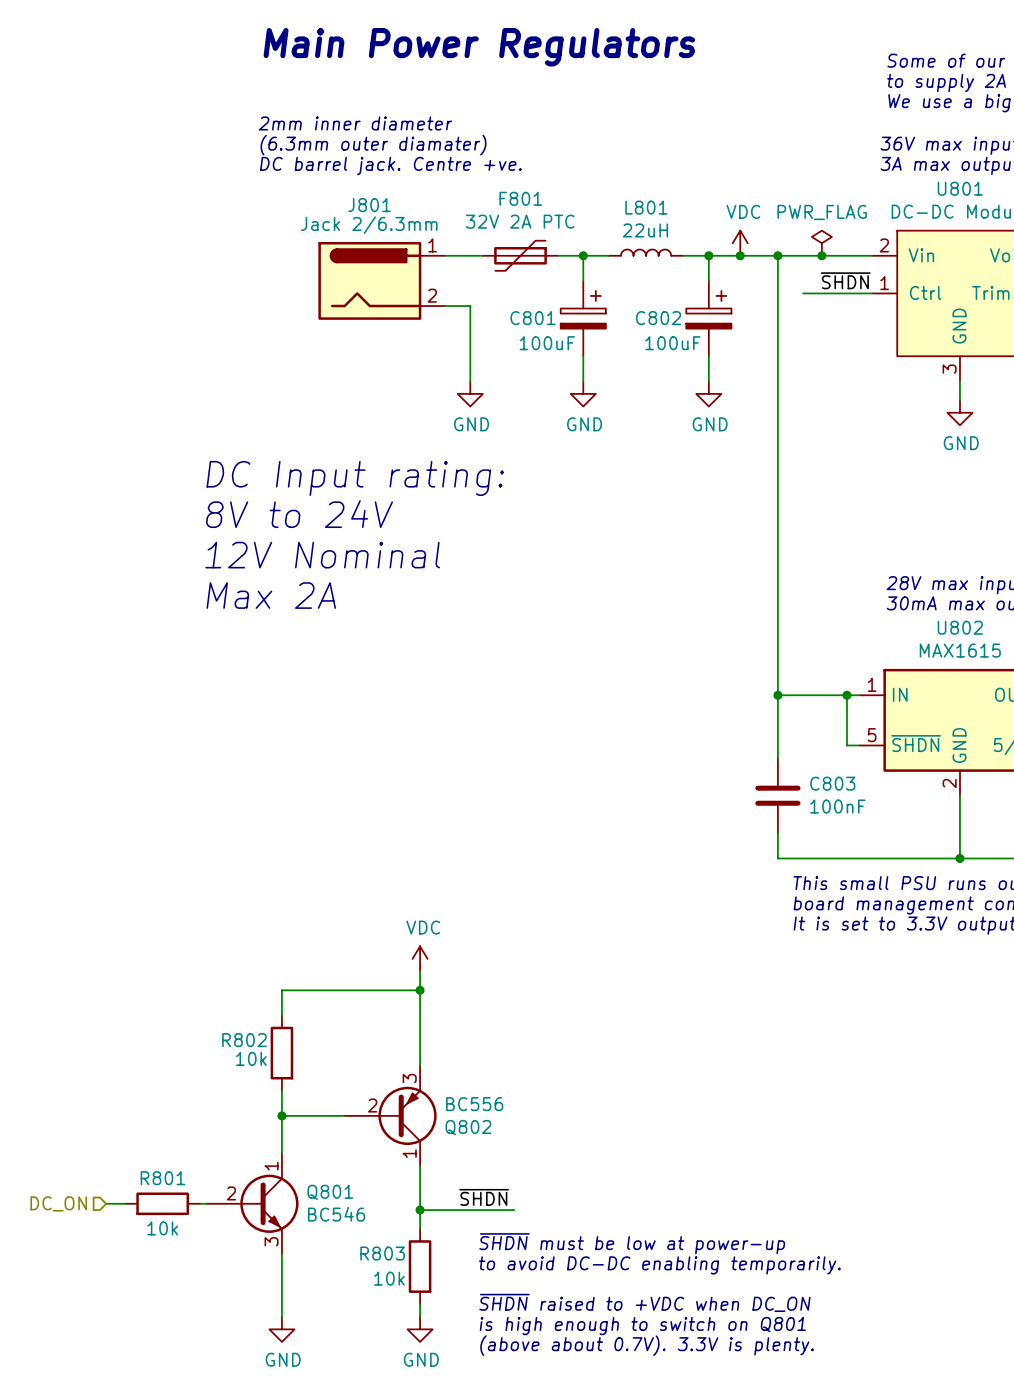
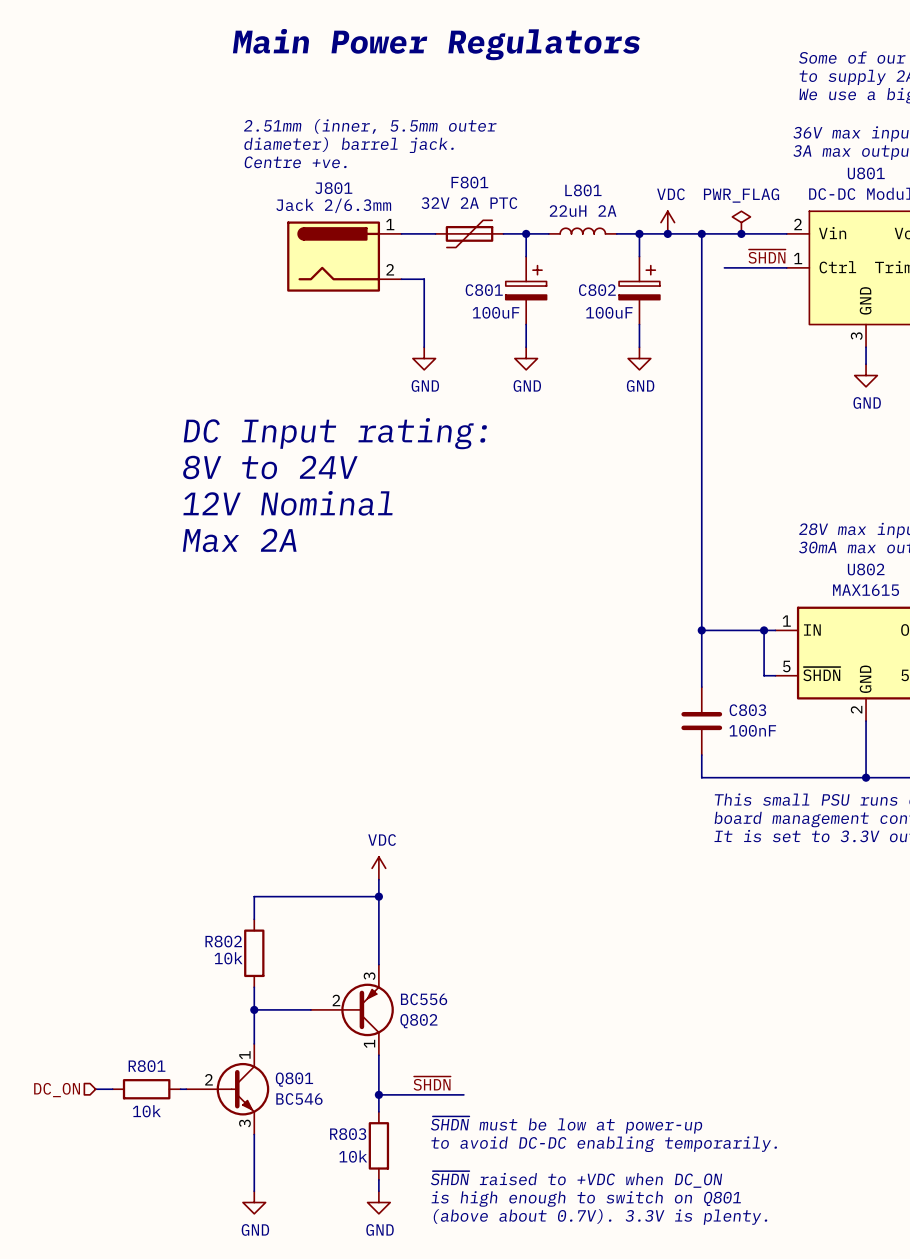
text: 2mm inner diameter (355, 123) -> 2.51mm (inner, 5.5mm outer (370, 126)
text: (6.3mm outer diamater) (373, 145) -> none
text: none -> diameter) barrel jack. (348, 145)
text: DC barrel jack. Centre +ve. (390, 165) -> none
text: none -> Centre +ve. (295, 162)
L801 value: 22uH (645, 230) -> 22uH 2A (583, 211)

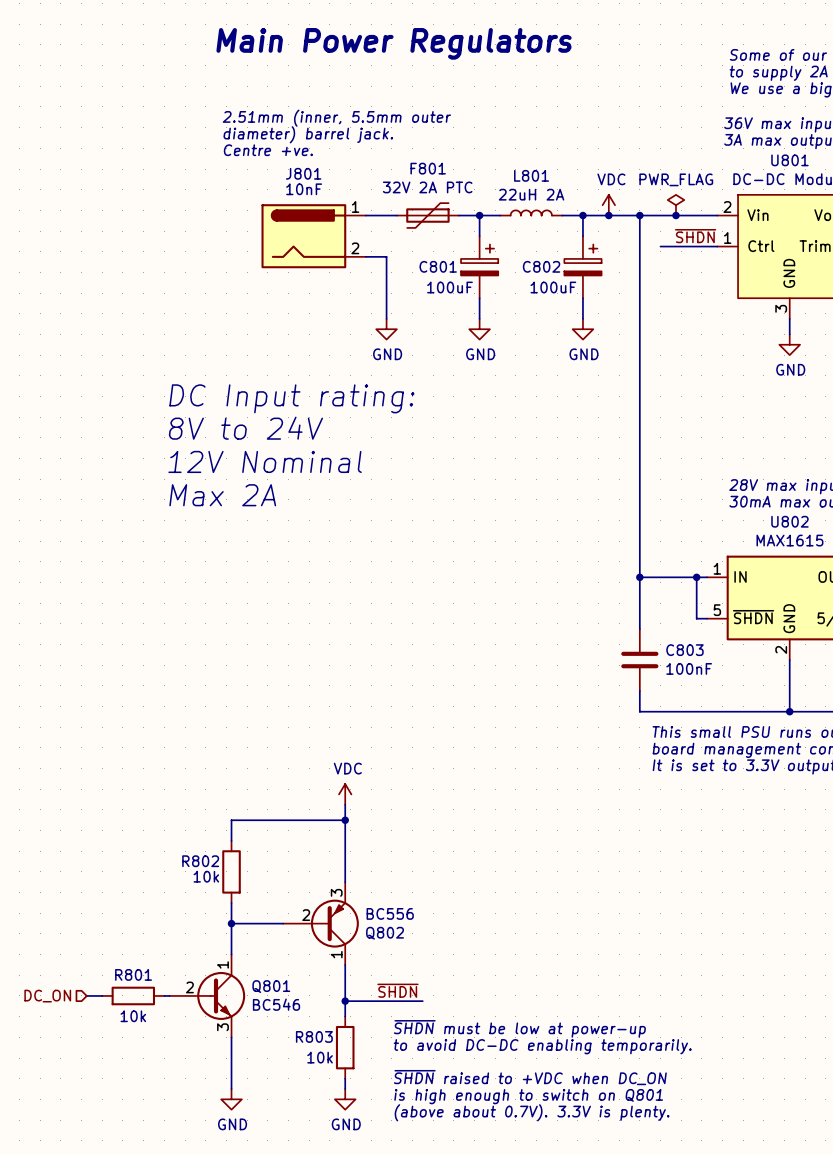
J801 value: Jack 2/6.3mm (333, 205) -> 10nF (304, 189)

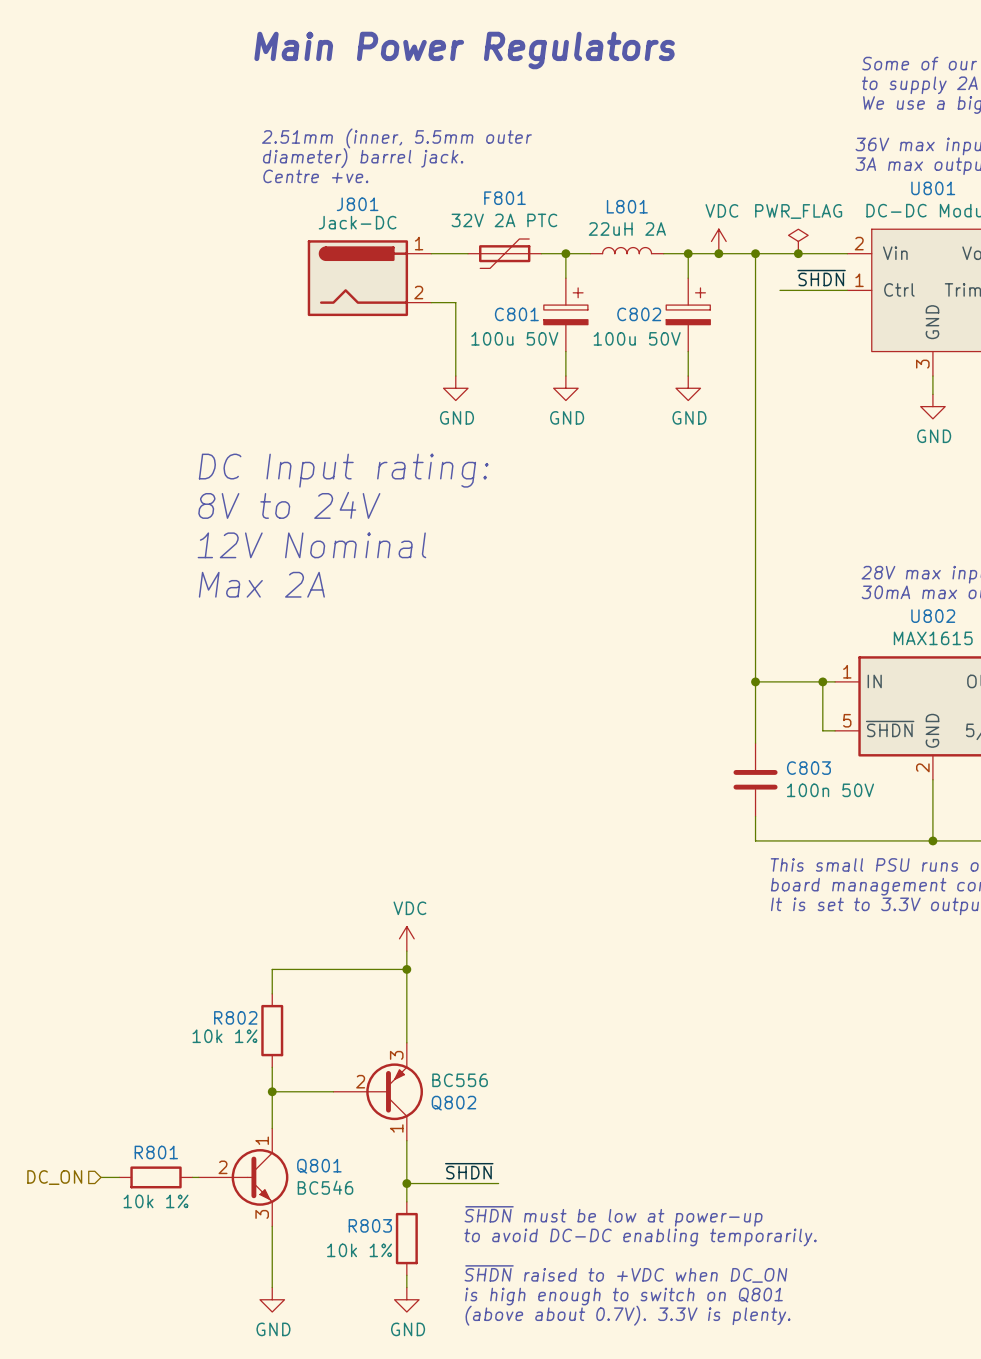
J801 value: 10nF (304, 189) -> Jack-DC (357, 222)
C801 value: 100uF (449, 287) -> 100u 50V (514, 338)
C802 value: 100uF (553, 287) -> 100u 50V (637, 338)
C803 value: 100nF (689, 668) -> 100n 50V (830, 790)
R802 value: 10k (206, 876) -> 10k 1% (224, 1036)
R801 value: 10k (133, 1016) -> 10k 1% (156, 1201)
R803 value: 10k (320, 1057) -> 10k 1% (359, 1250)

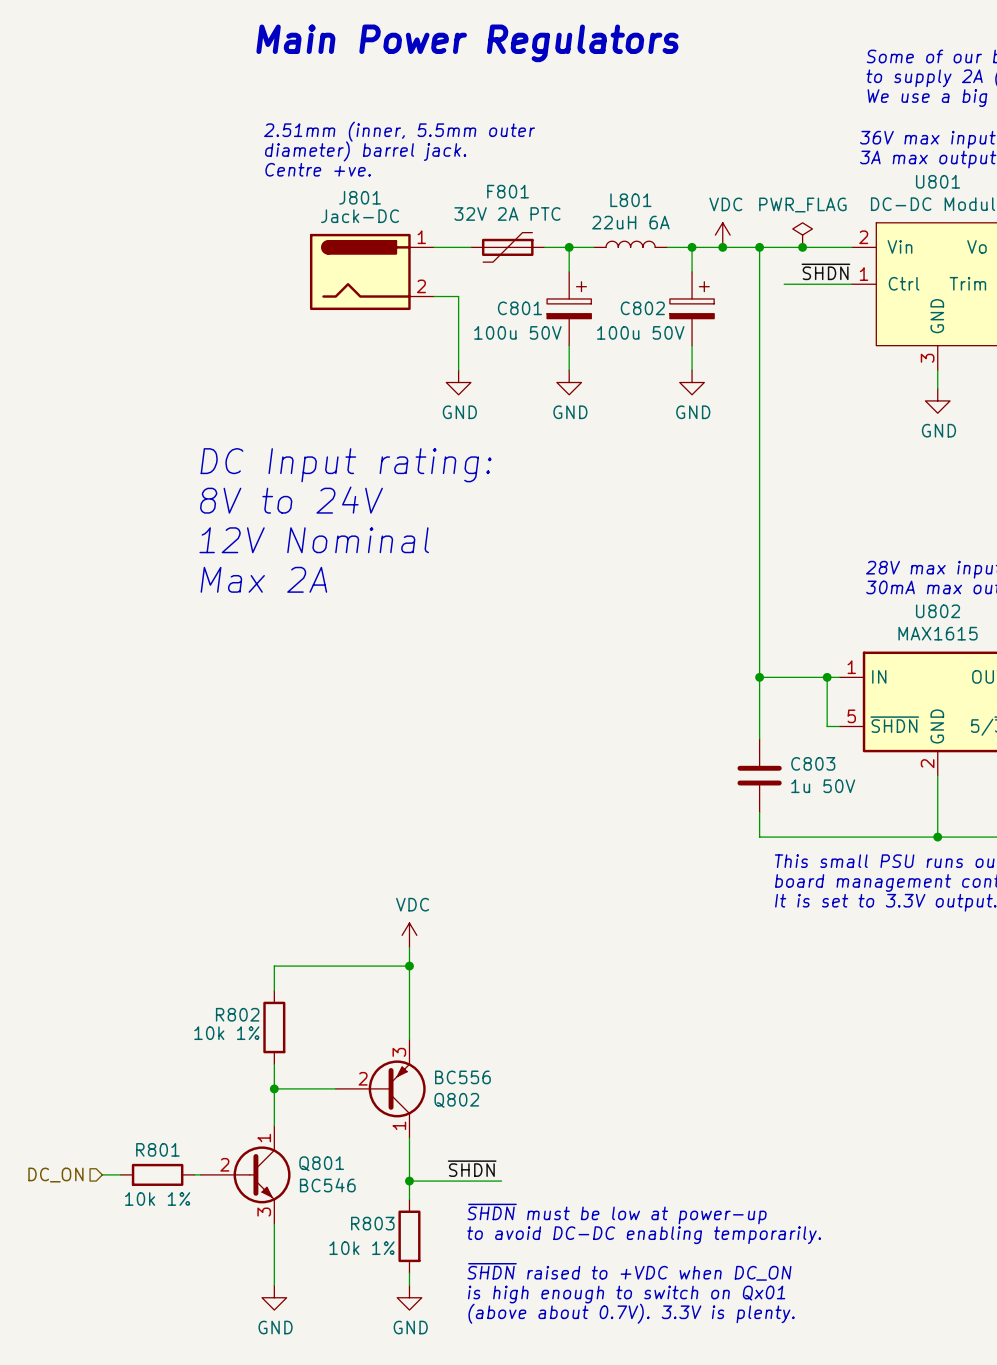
L801 value: 22uH 2A (627, 229) -> 22uH 6A (630, 222)
C803 value: 100n 50V (830, 790) -> 1u 50V (823, 786)
text: is high enough to switch on Q801 (623, 1296) -> is high enough to switch on Qx01 (626, 1294)

